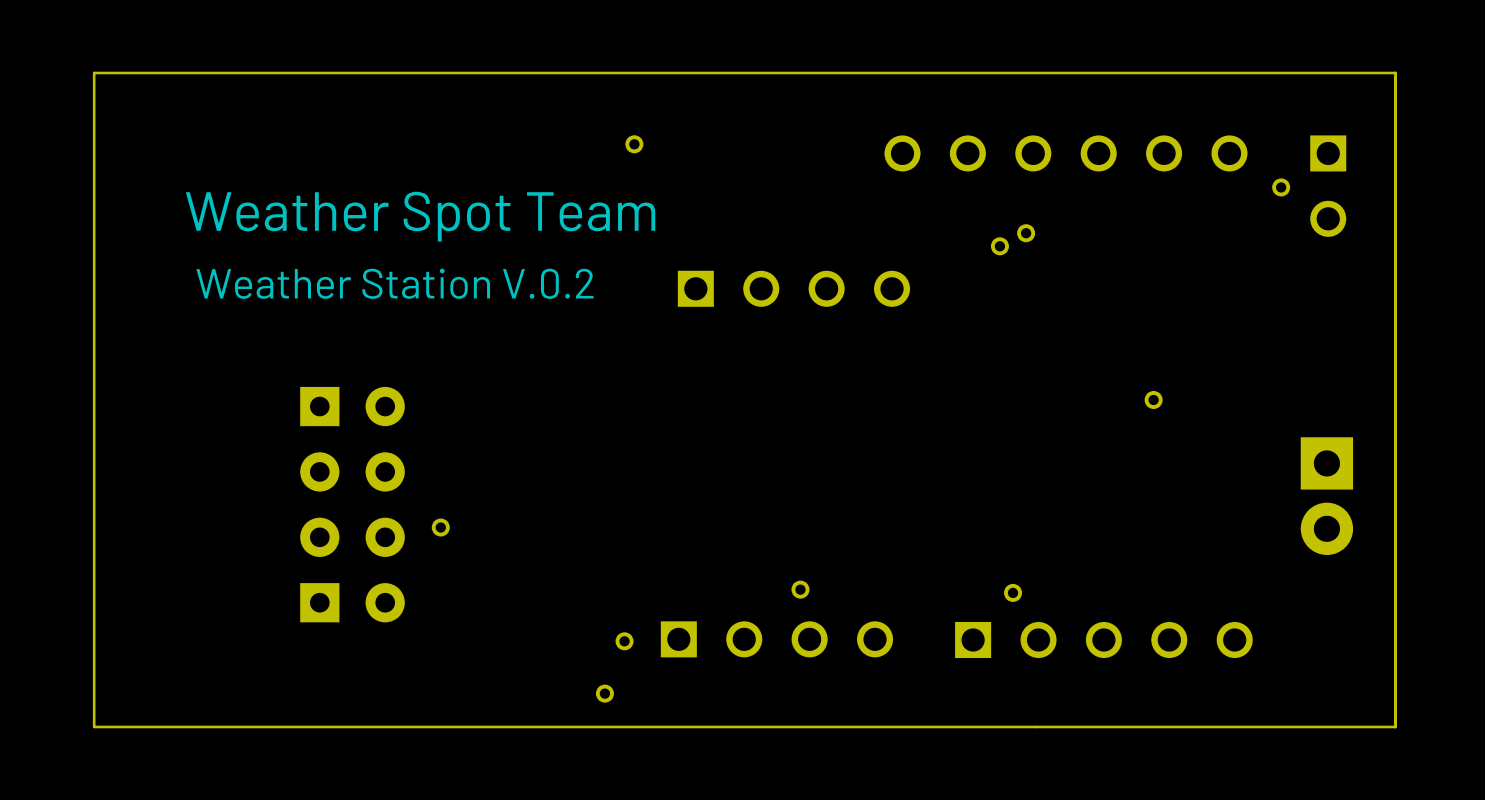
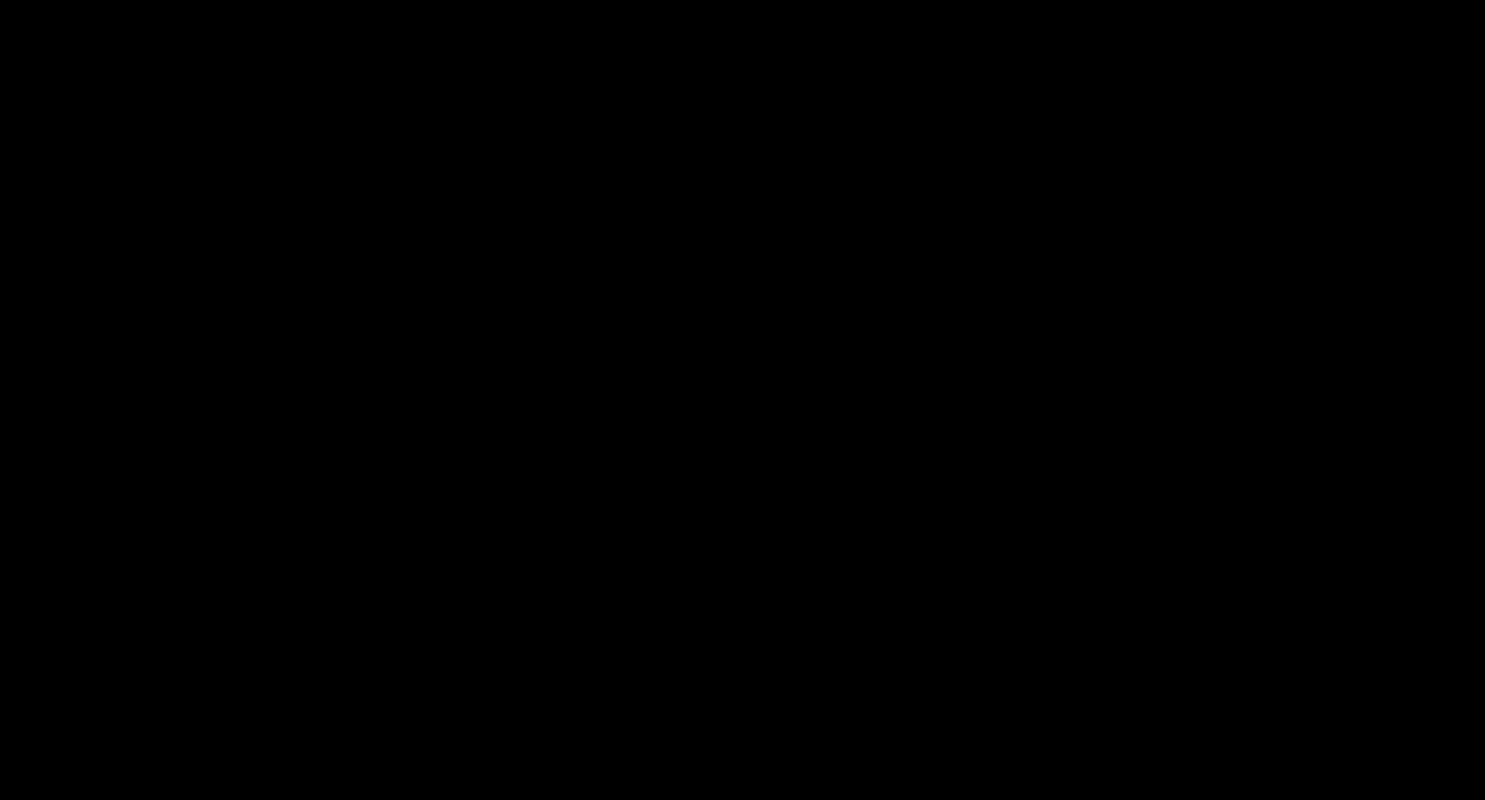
board edge: (1395, 72) (94, 72) (94, 726) (1395, 726) (1395, 72) -> none
part: (634, 144) -> none
part: (1065, 153) -> none
part: (1328, 186) -> none
part: (1281, 187) -> none
text: Weather Spot Team (420, 216) -> none
part: (1026, 233) -> none
part: (999, 246) -> none
text: Weather Station V.0.2 (395, 283) -> none
part: (793, 288) -> none
part: (1153, 399) -> none
part: (1326, 496) -> none
part: (352, 504) -> none
part: (440, 527) -> none
part: (800, 589) -> none
part: (1013, 592) -> none
part: (776, 639) -> none
part: (1103, 640) -> none
part: (624, 641) -> none
part: (604, 693) -> none

